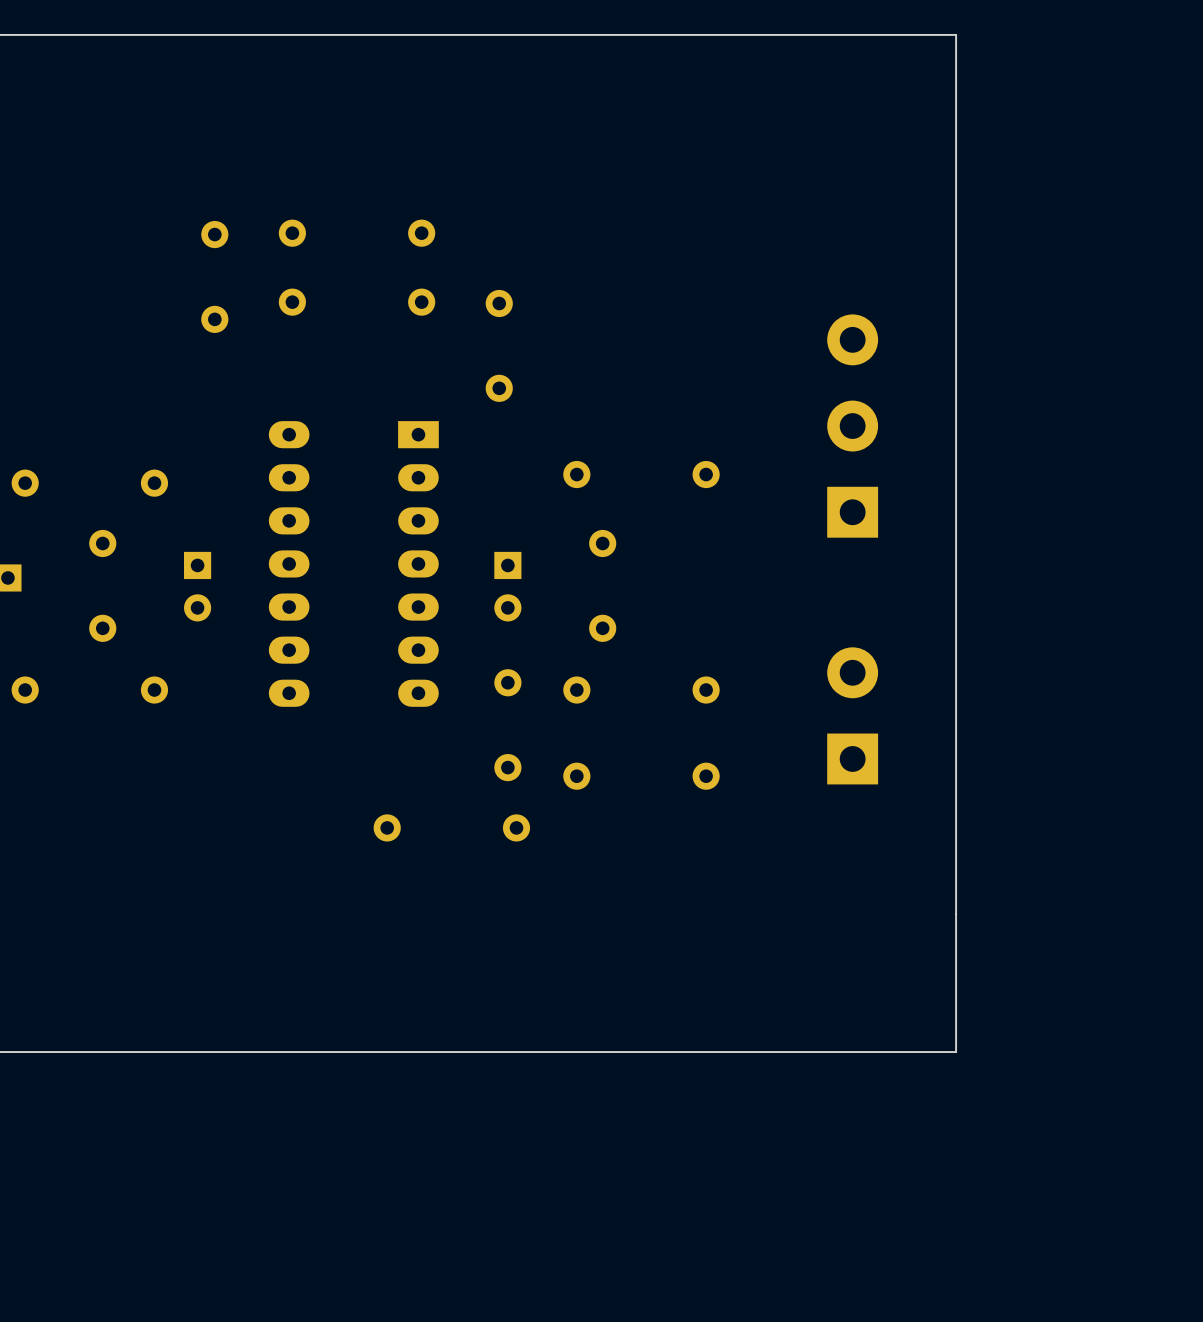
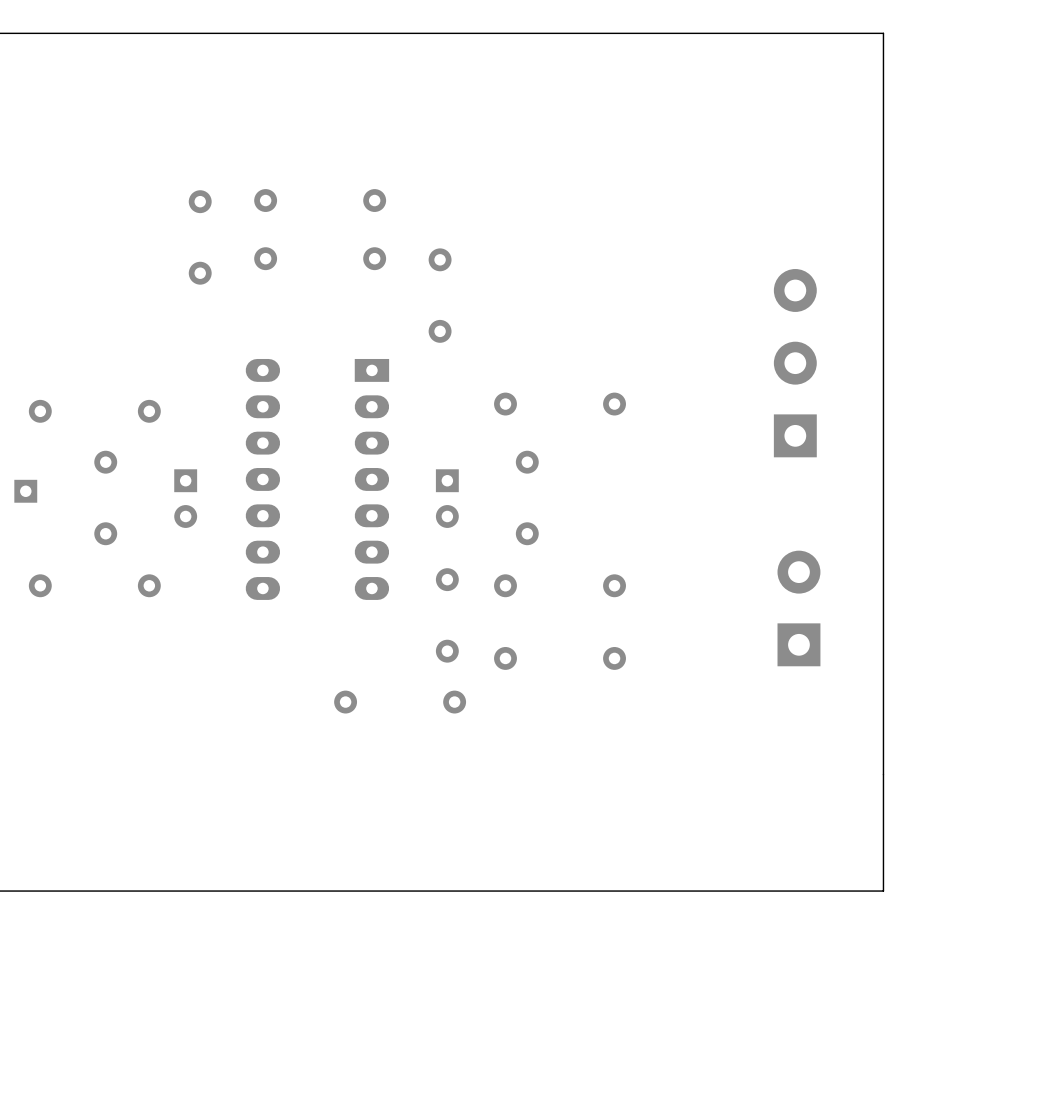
board edge: (956, 34) (956, 1052) -> (825, 33) (883, 33) (883, 891) (825, 891)
part position: (852, 426) -> (795, 363)
part position: (852, 715) -> (798, 608)

